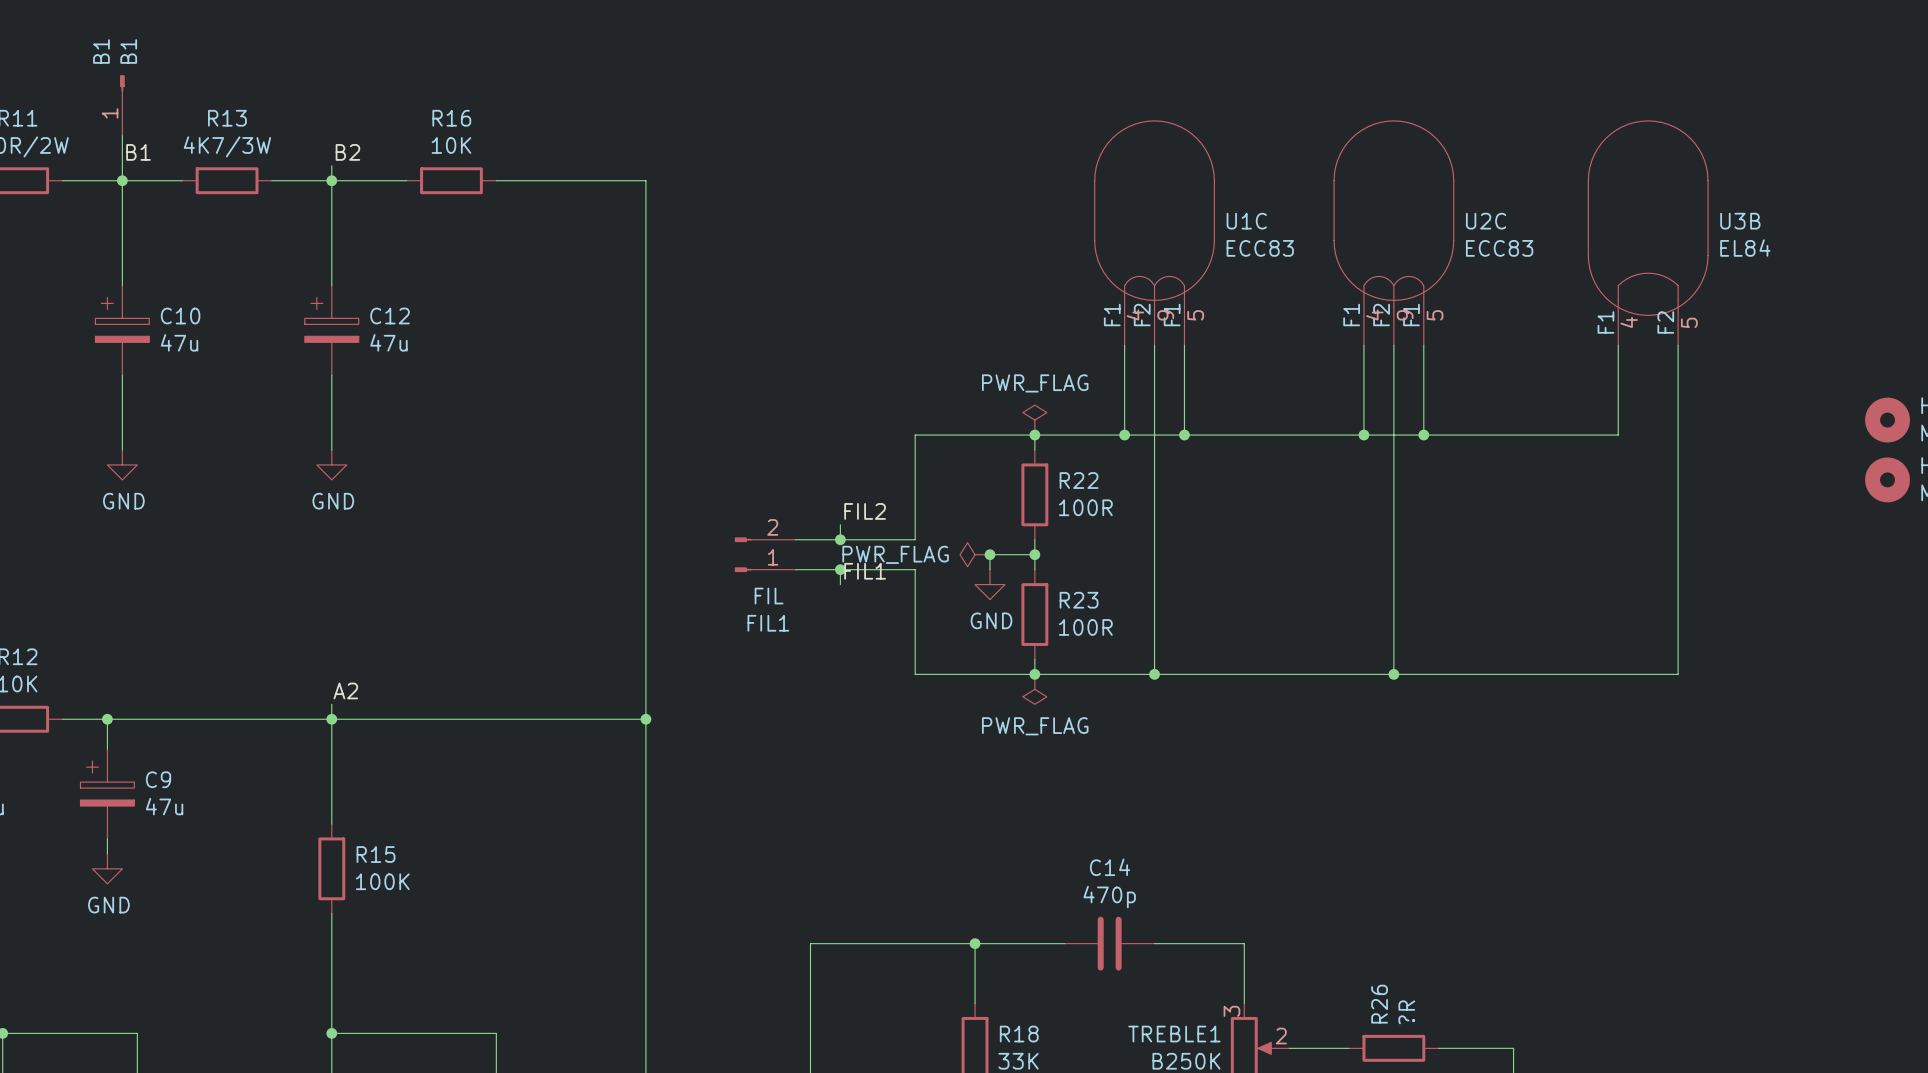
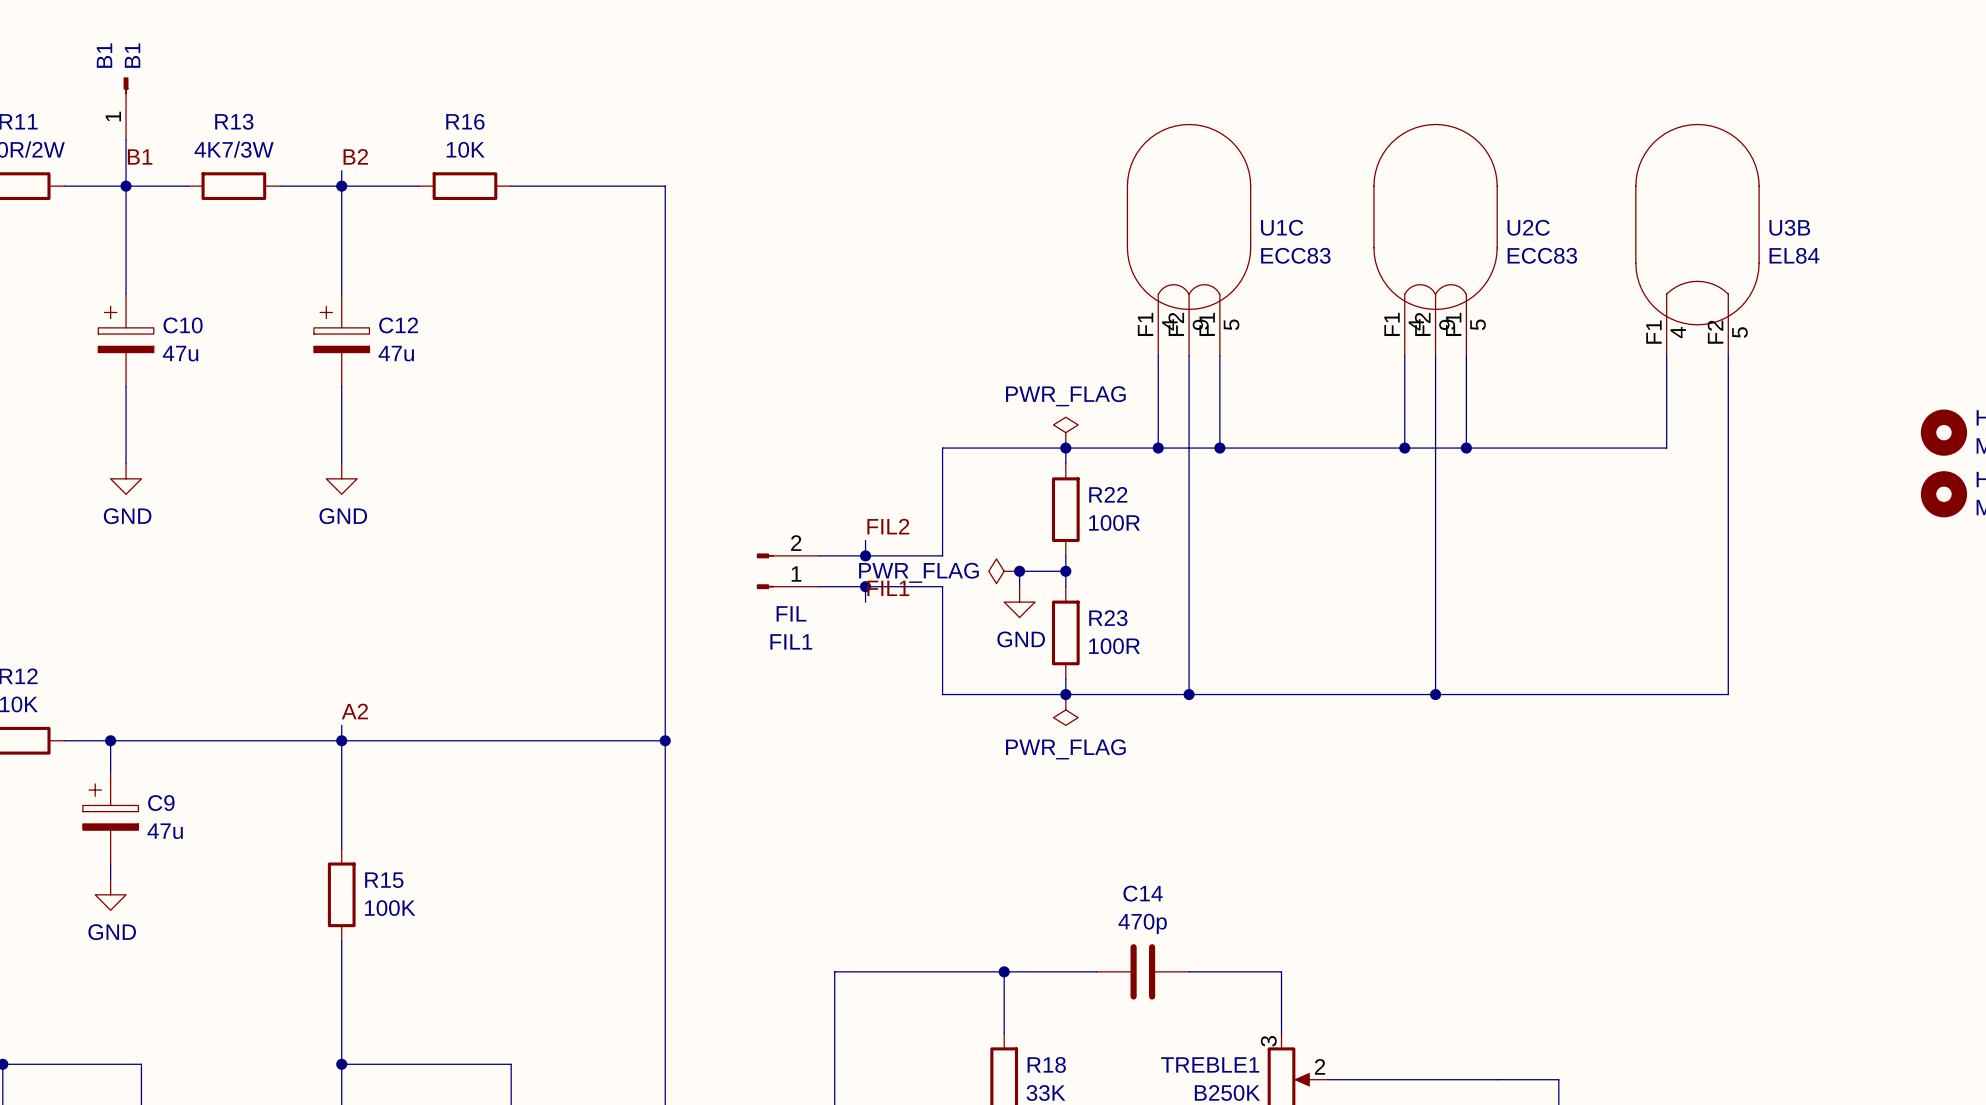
wire: none -> (1389, 1079) (1481, 1079)
R26: ?R (1393, 1048) -> none

